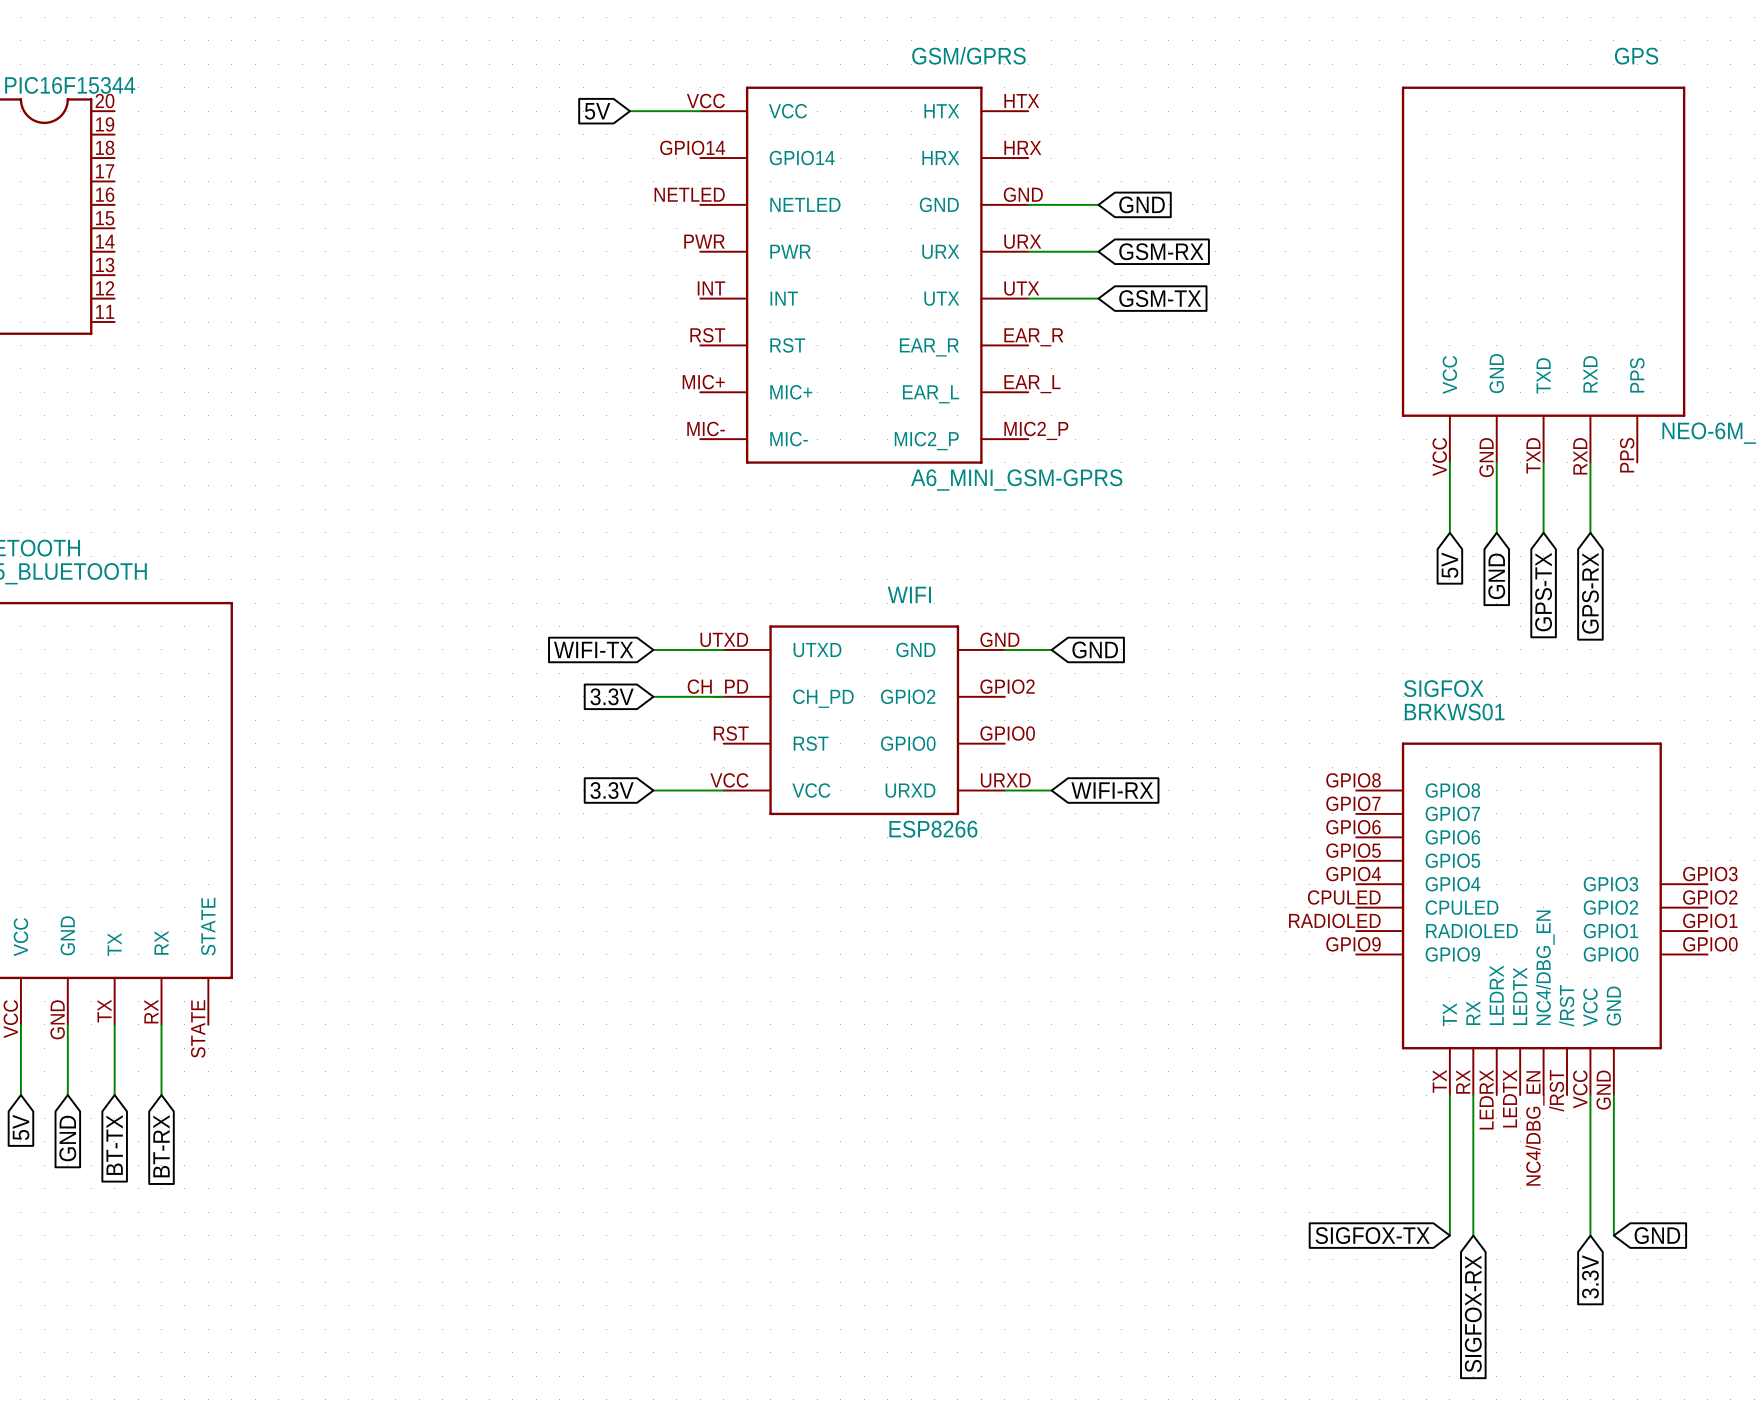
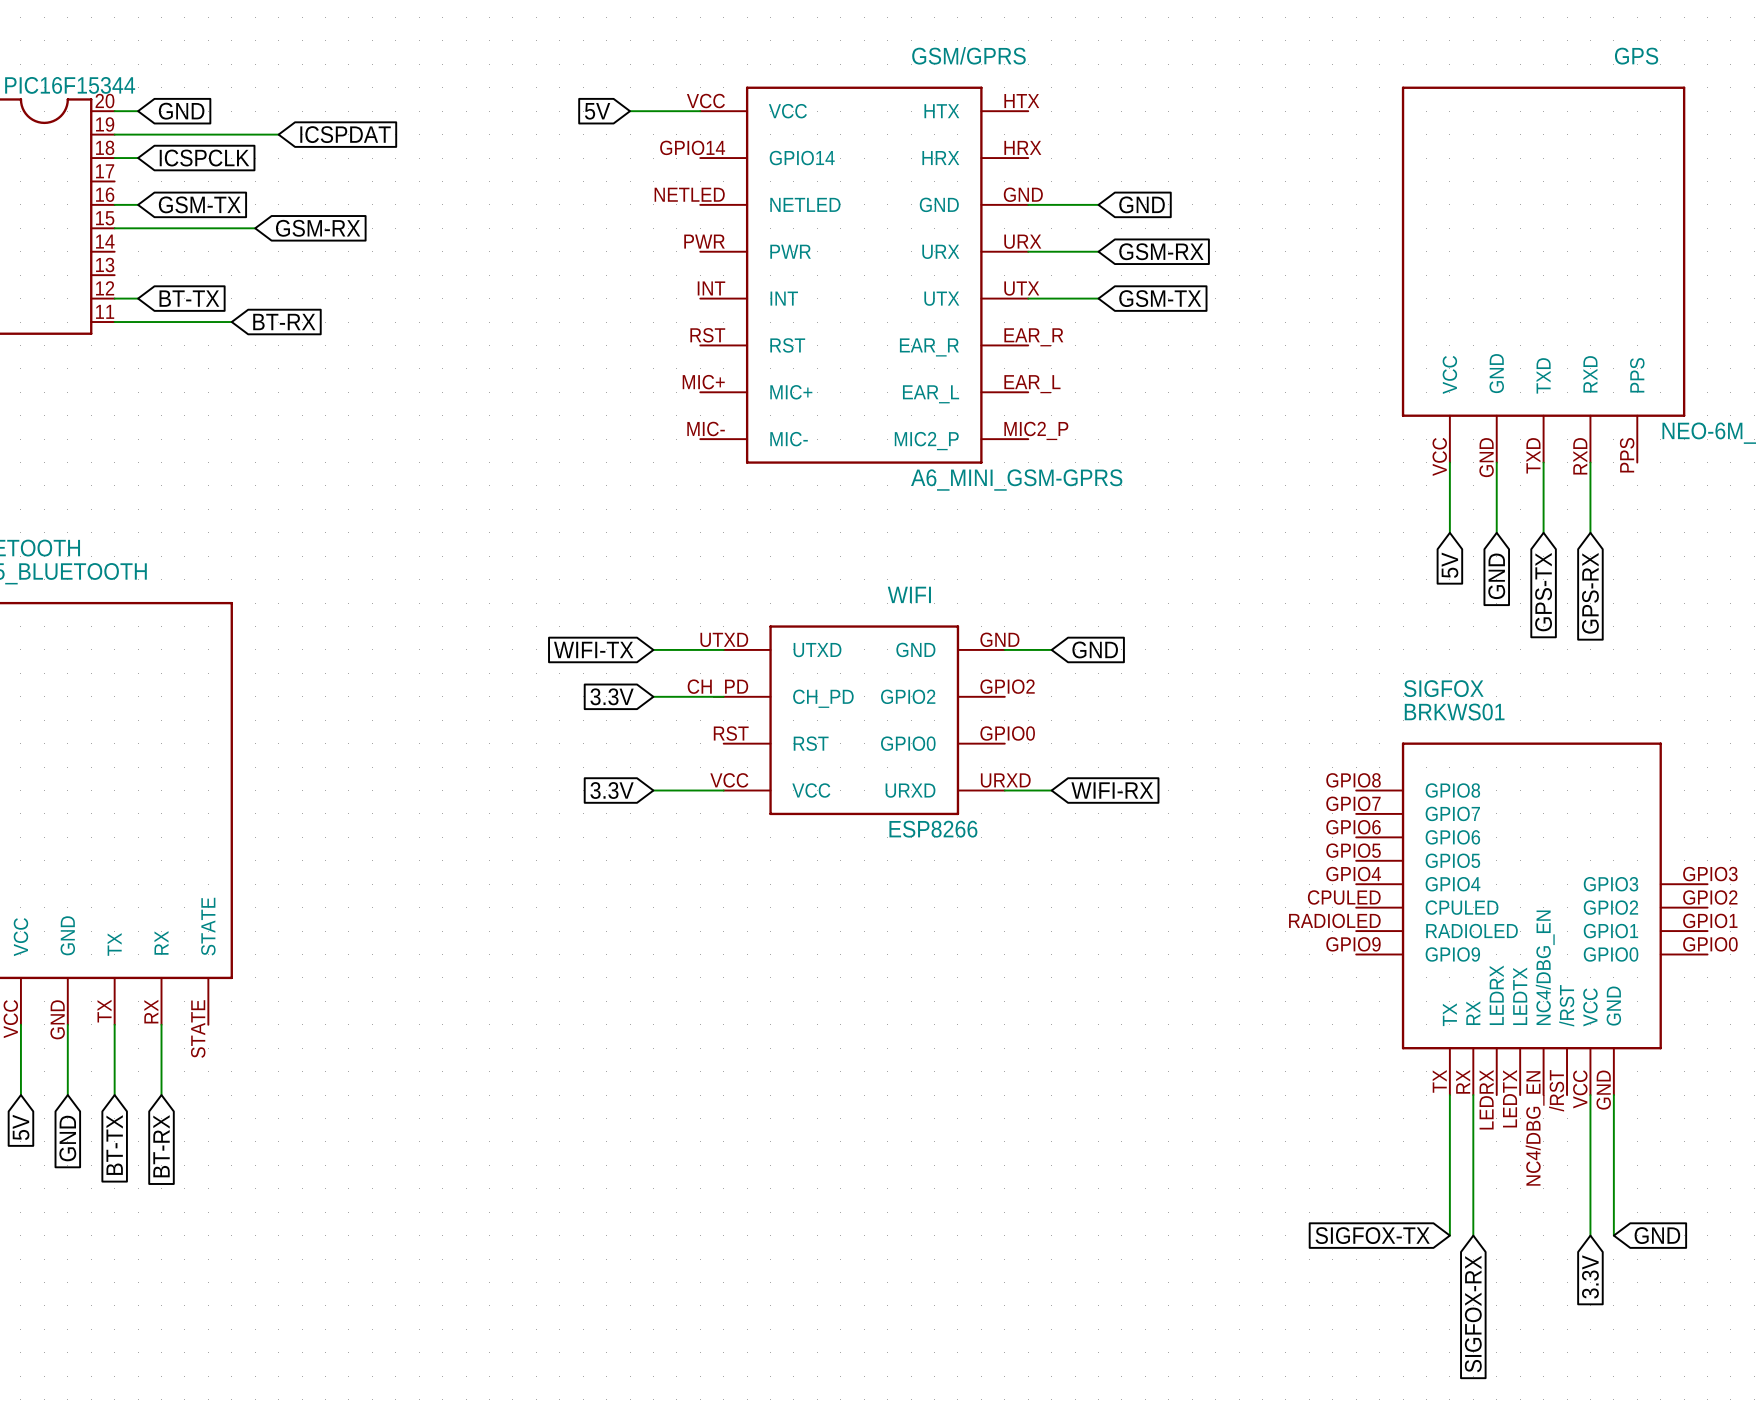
wire: none -> (114, 111) (138, 111)
global label: none -> GND (181, 111)
wire: none -> (114, 134) (278, 134)
global label: none -> ICSPDAT (345, 134)
wire: none -> (114, 158) (138, 158)
global label: none -> ICSPCLK (204, 158)
wire: none -> (114, 204) (138, 204)
global label: none -> GSM-TX (199, 204)
wire: none -> (114, 228) (255, 228)
global label: none -> GSM-RX (318, 228)
wire: none -> (114, 298) (138, 298)
global label: none -> BT-TX (189, 298)
wire: none -> (114, 322) (231, 322)
global label: none -> BT-RX (284, 322)

